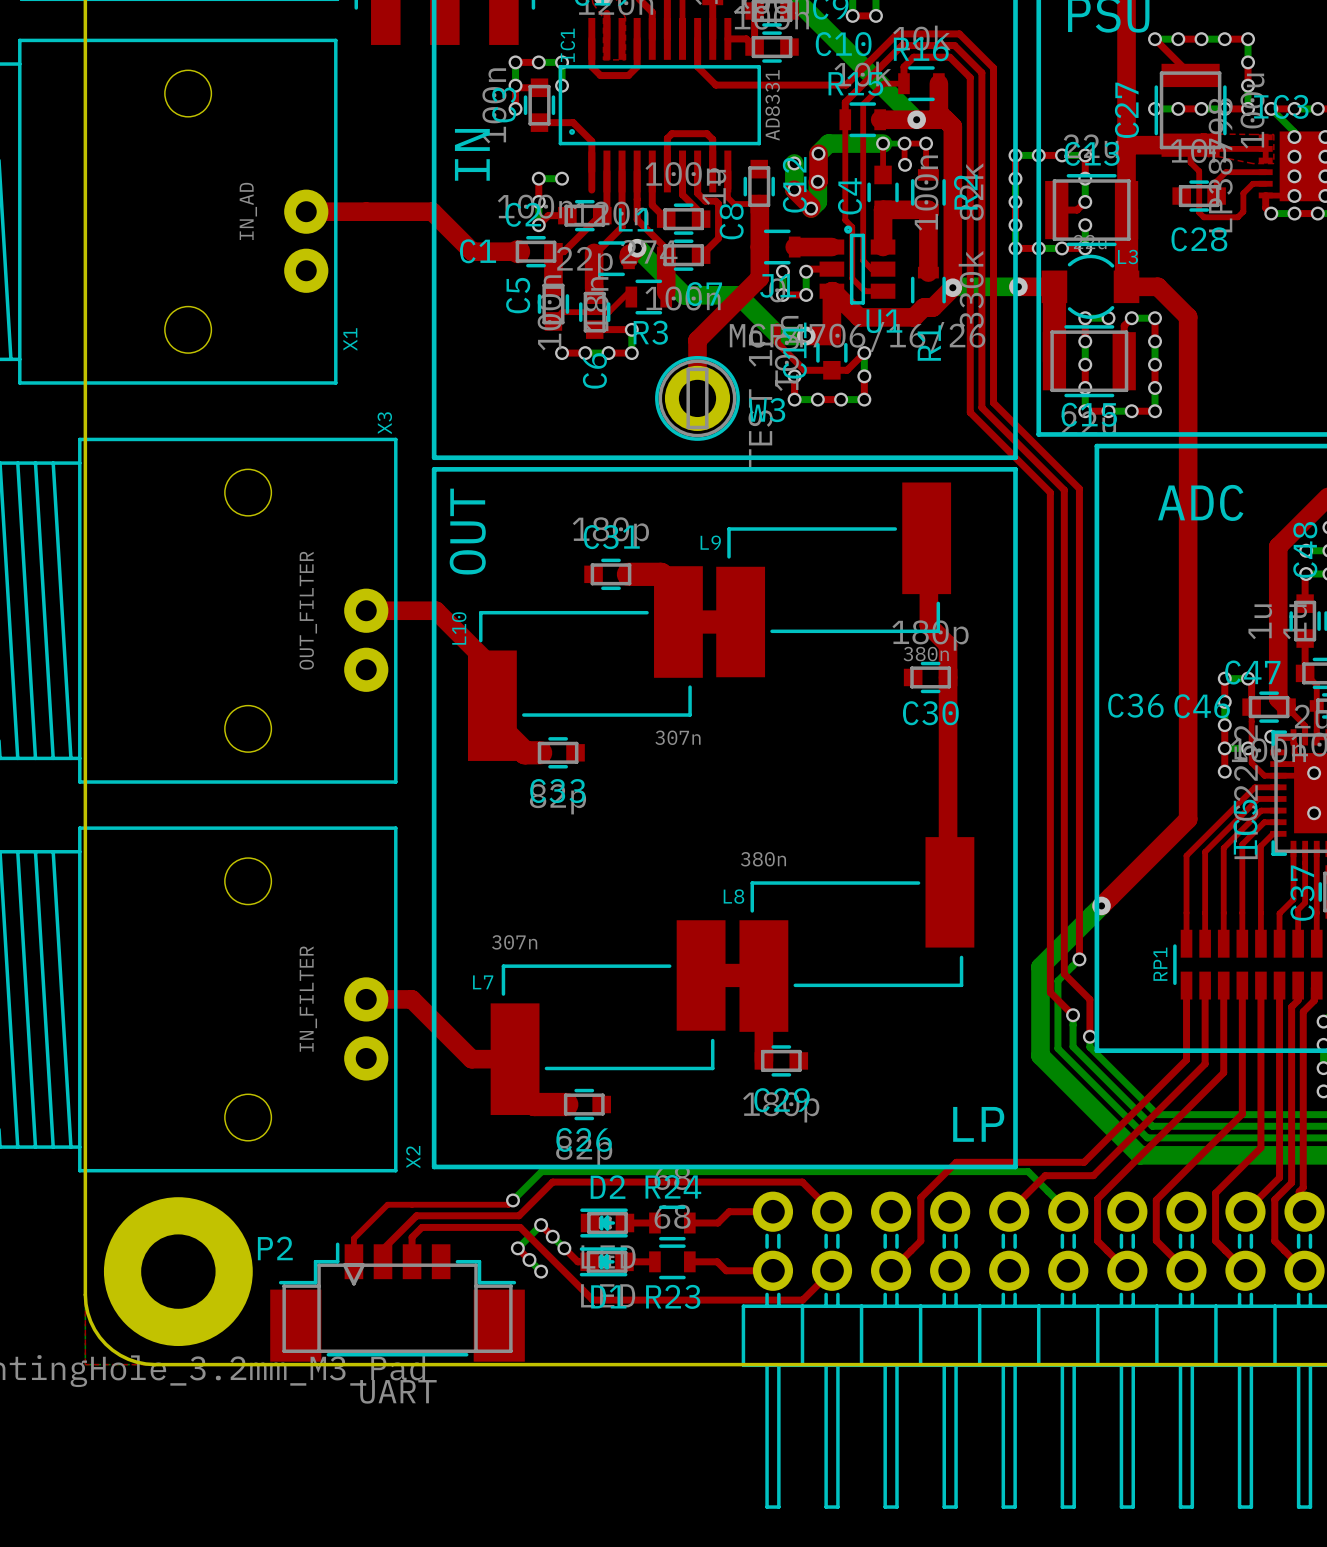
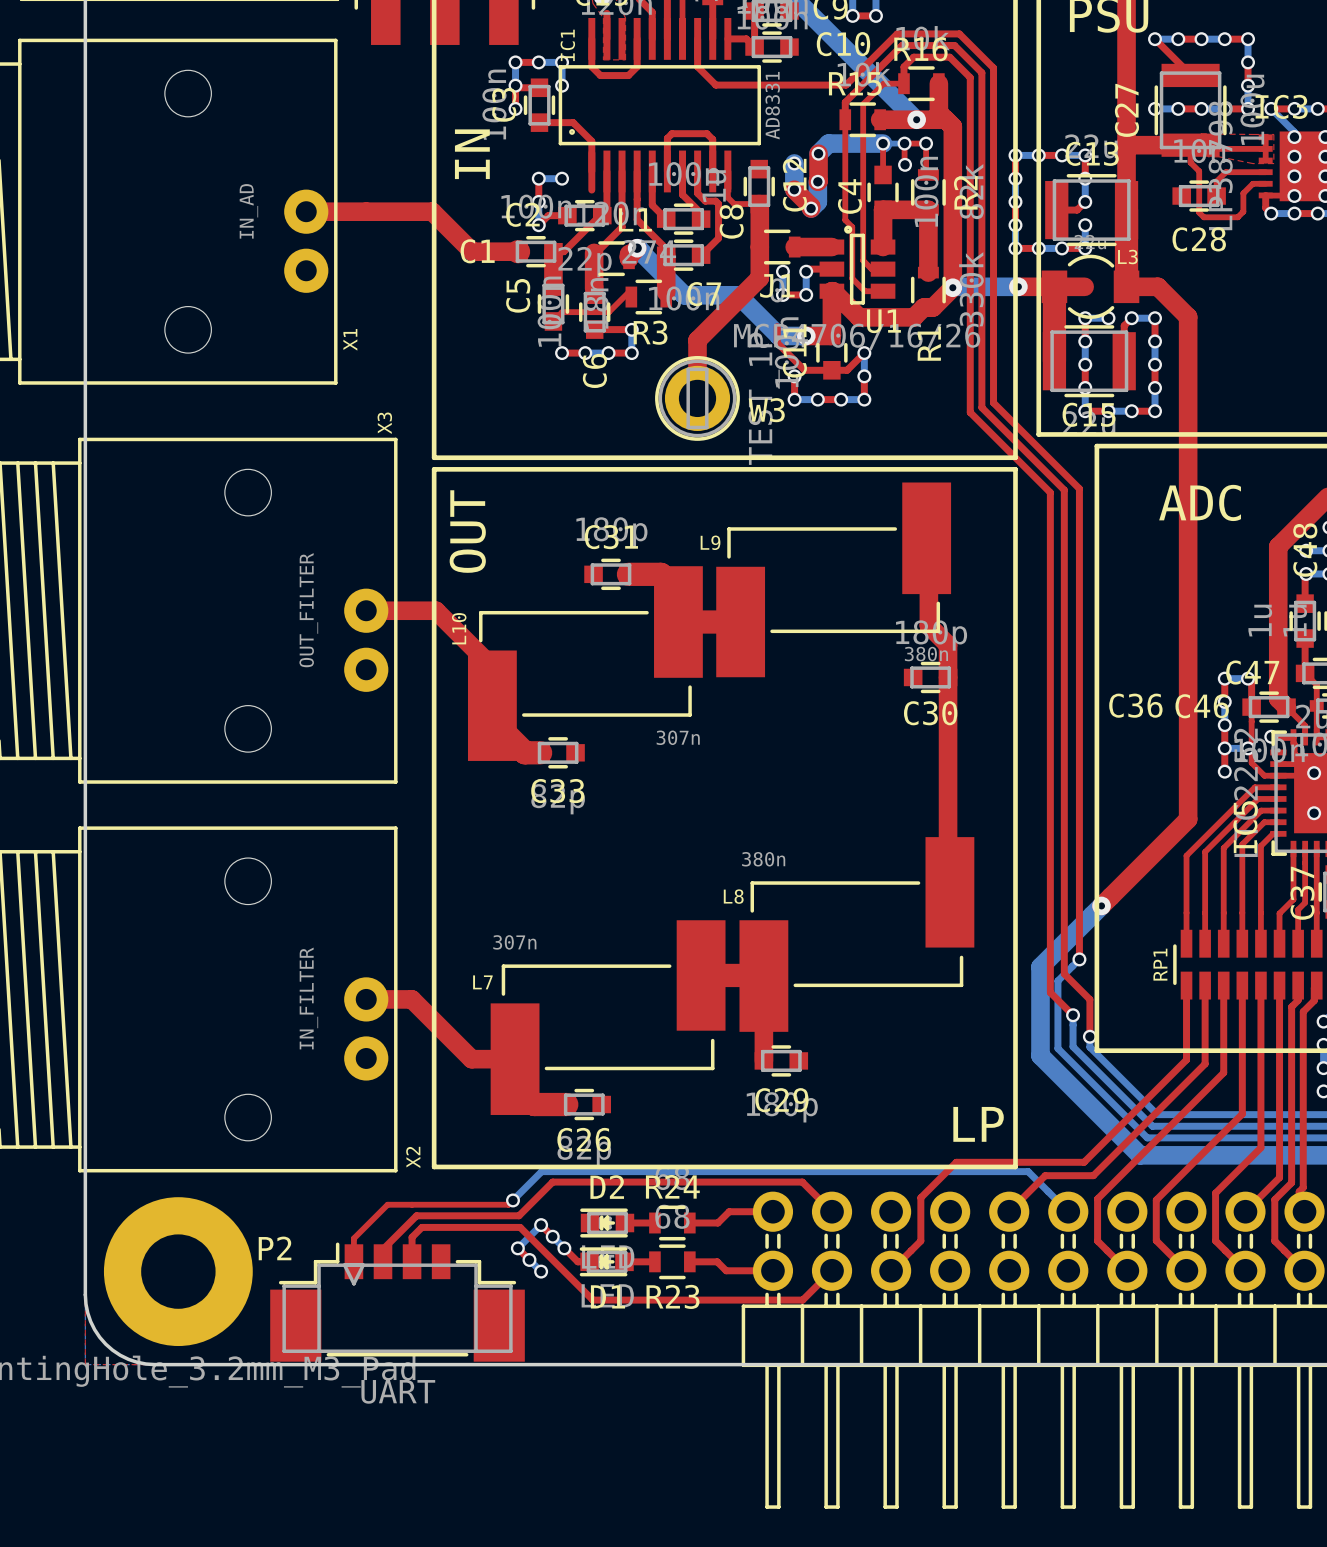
top track: none -> (1054, 286) (1084, 286)

